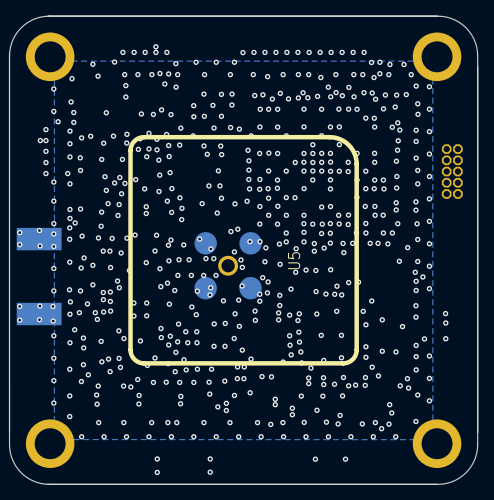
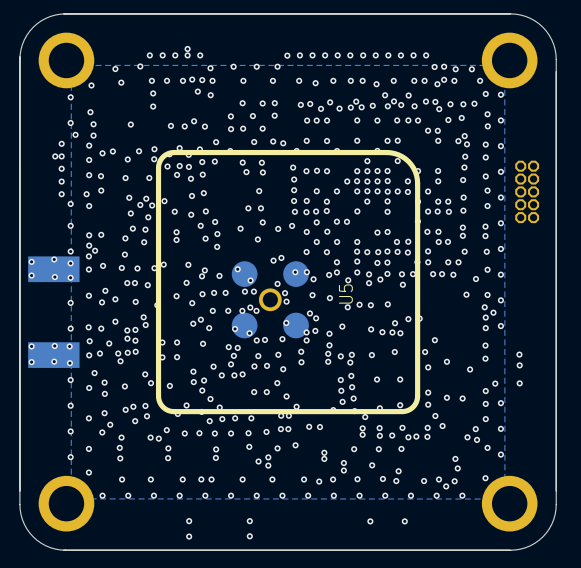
via: none -> (250, 307)
via: (210, 287) -> none
via: none -> (256, 340)
via: none -> (237, 347)
via: none -> (258, 356)
via: none -> (231, 364)
via: none -> (242, 374)
via: (177, 341) -> none
via: (187, 342) -> none
via: (196, 342) -> none

